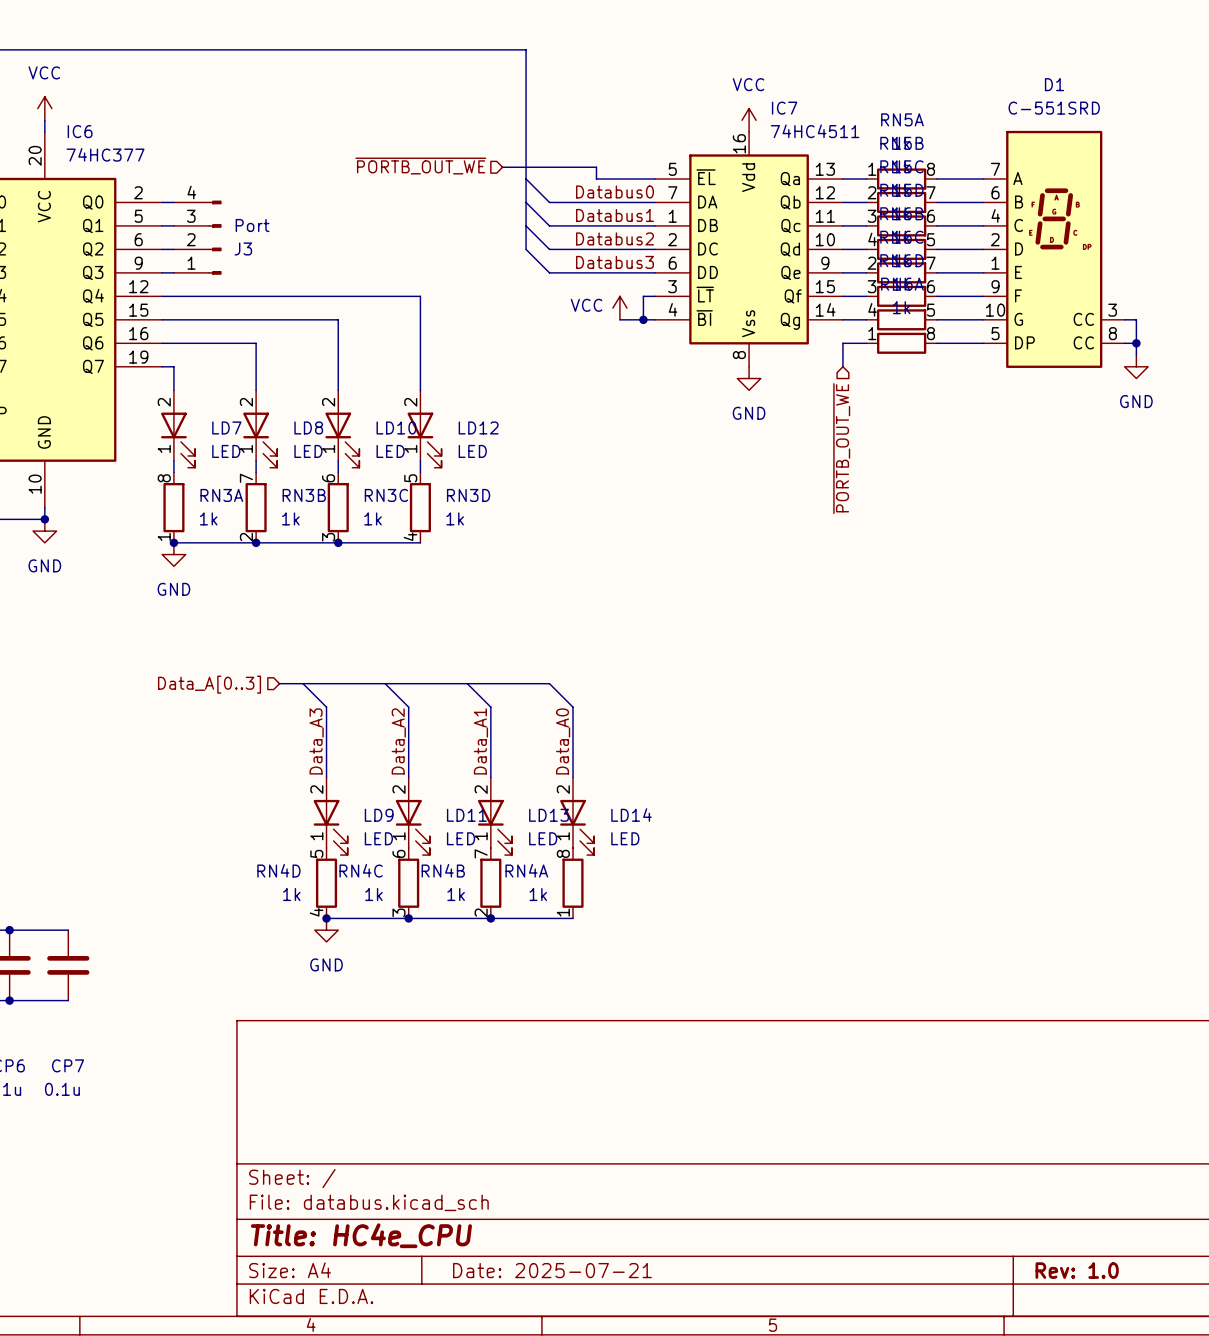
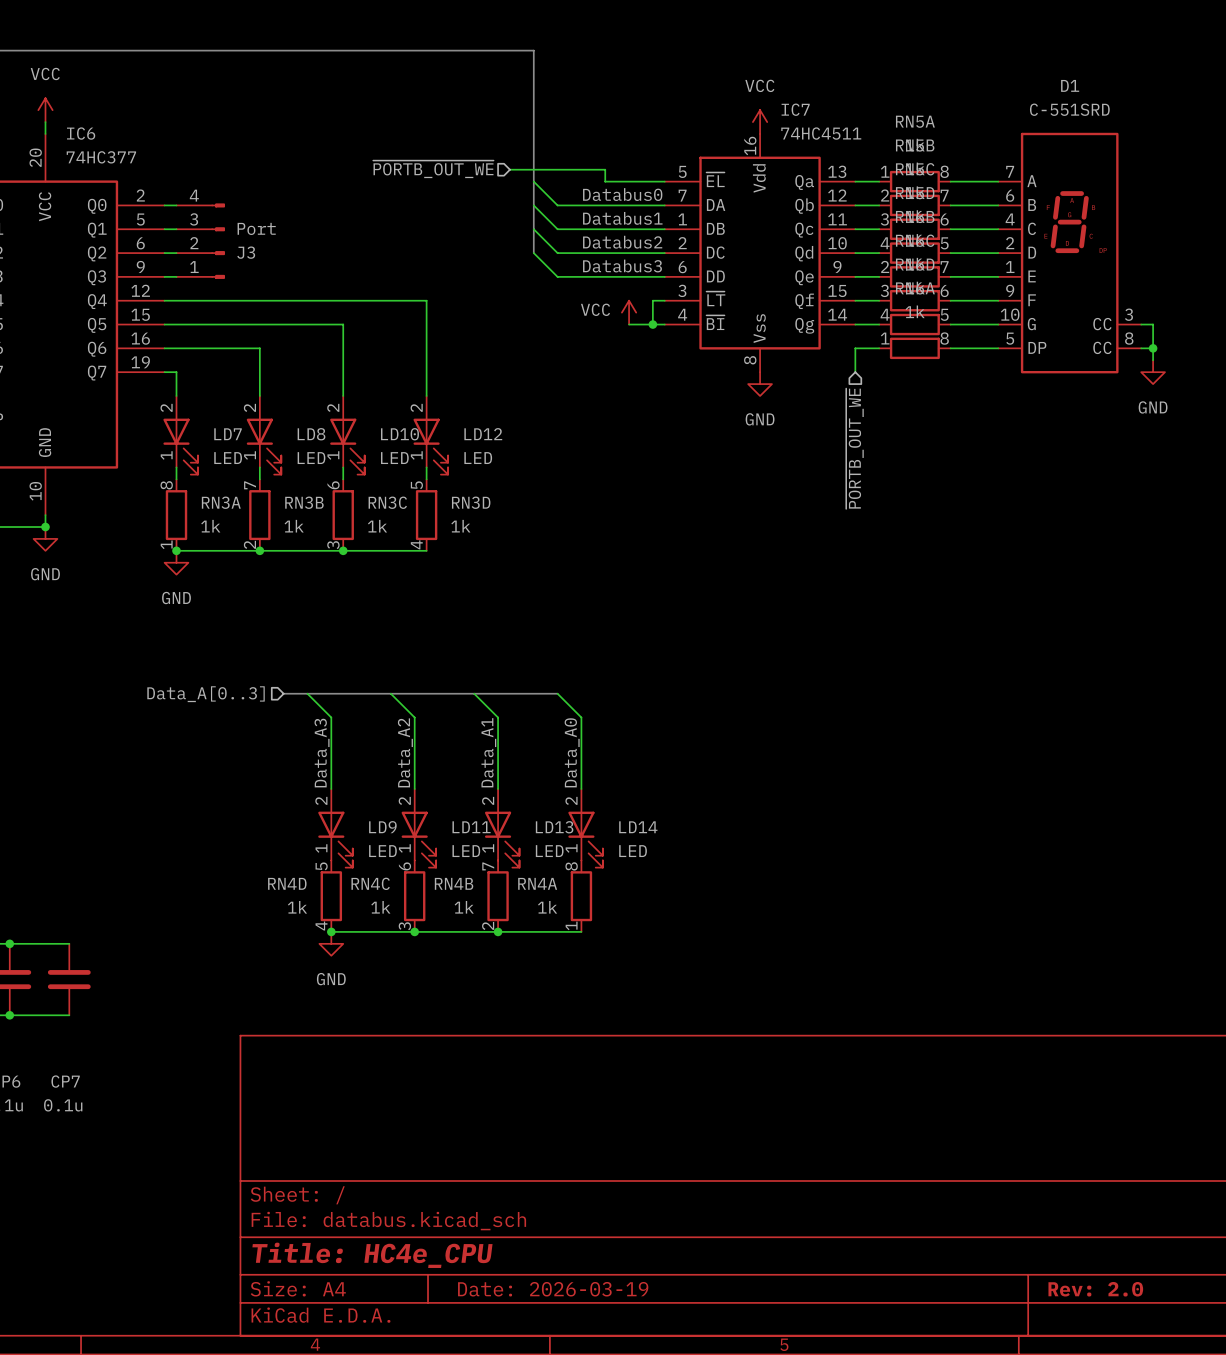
title block: Date: 2025-07-21 (552, 1270) -> Date: 2026-03-19 (553, 1289)
title block: Rev: 1.0 (1077, 1270) -> Rev: 2.0 (1095, 1289)

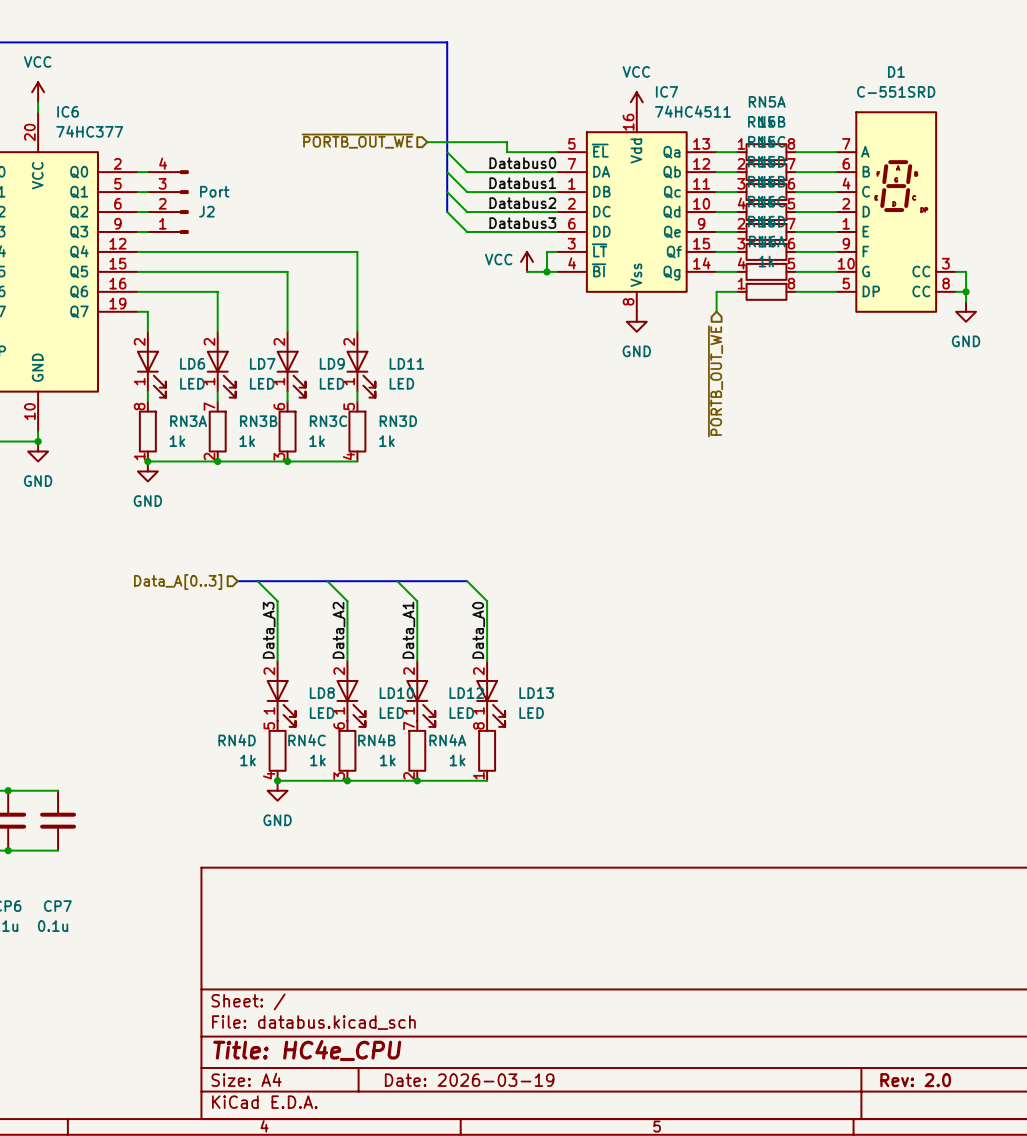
J3 name: J3 (246, 252) -> J2 (206, 211)
LD7 name: LD7 (228, 434) -> LD6 (192, 363)
LD8 name: LD8 (311, 434) -> LD7 (262, 363)
LD10 name: LD10 (399, 434) -> LD9 (332, 363)
LD12 name: LD12 (483, 434) -> LD11 (406, 363)
LD9 name: LD9 (382, 827) -> LD8 (322, 693)
LD11 name: LD11 (471, 827) -> LD10 (396, 693)
LD13 name: LD13 (554, 827) -> LD12 (466, 693)
LD14 name: LD14 (638, 827) -> LD13 (536, 693)

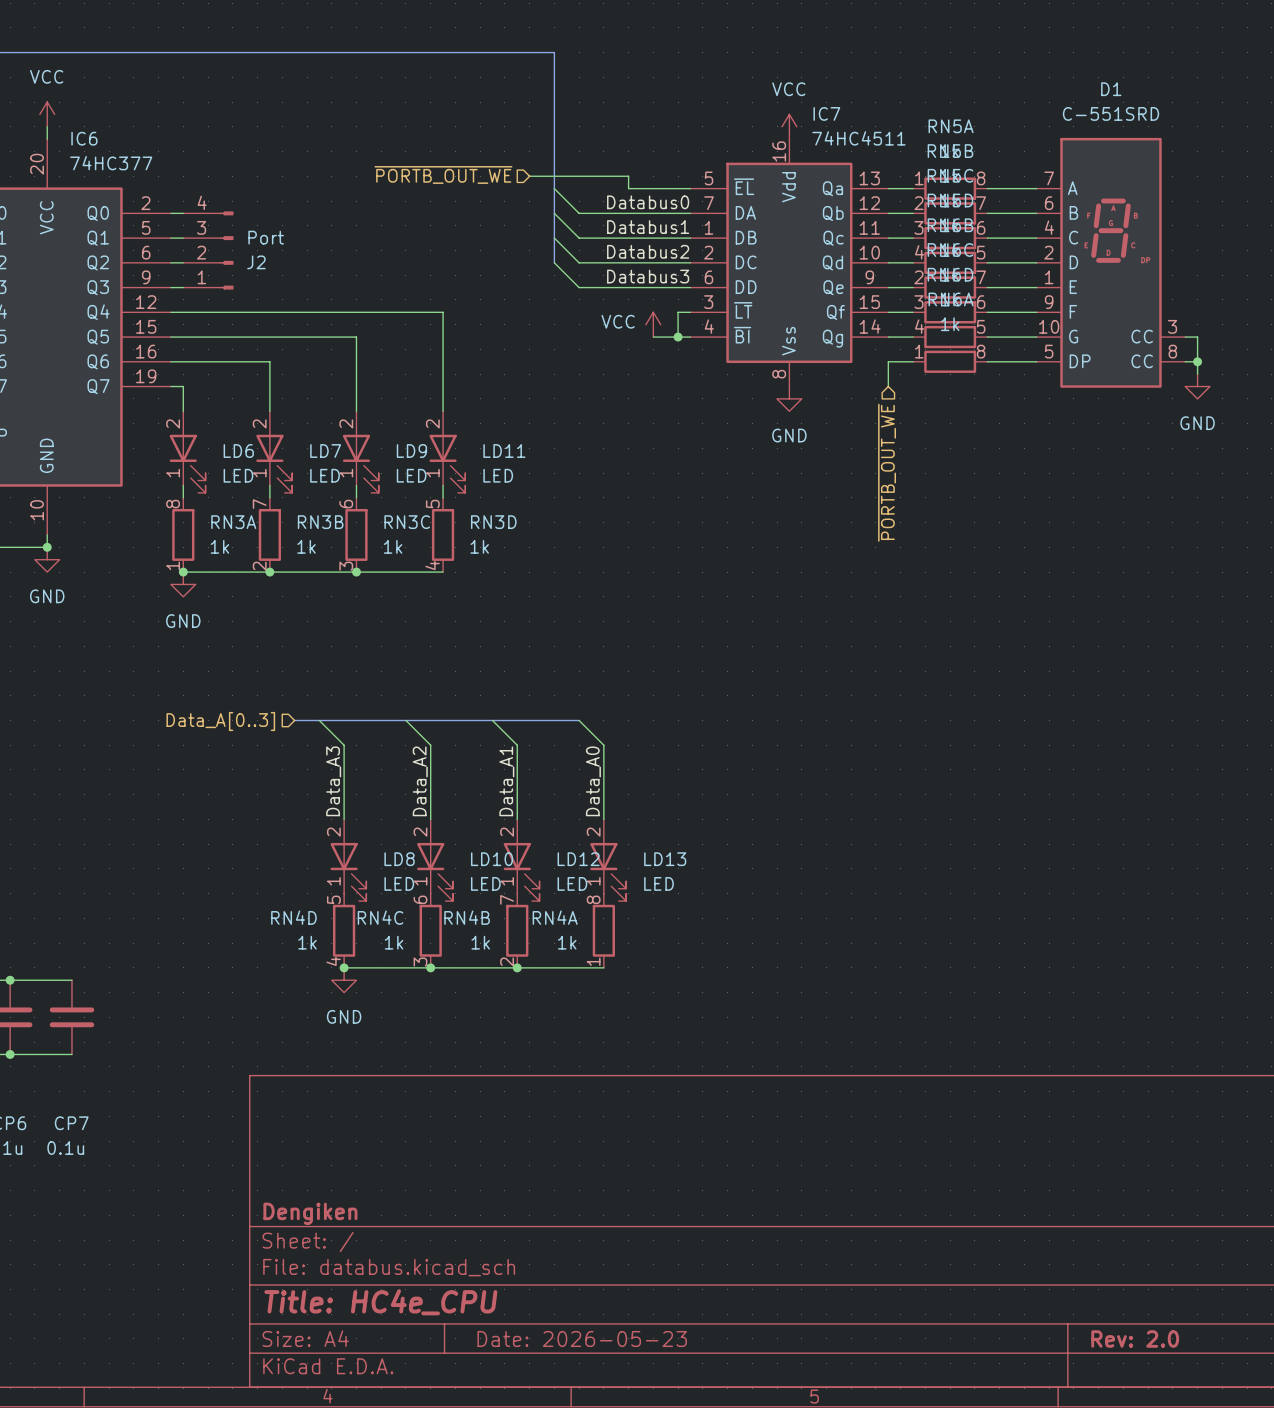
title block: none -> Dengiken (310, 1213)
title block: Date: 2026-03-19 (469, 1080) -> Date: 2026-05-23 (582, 1338)

